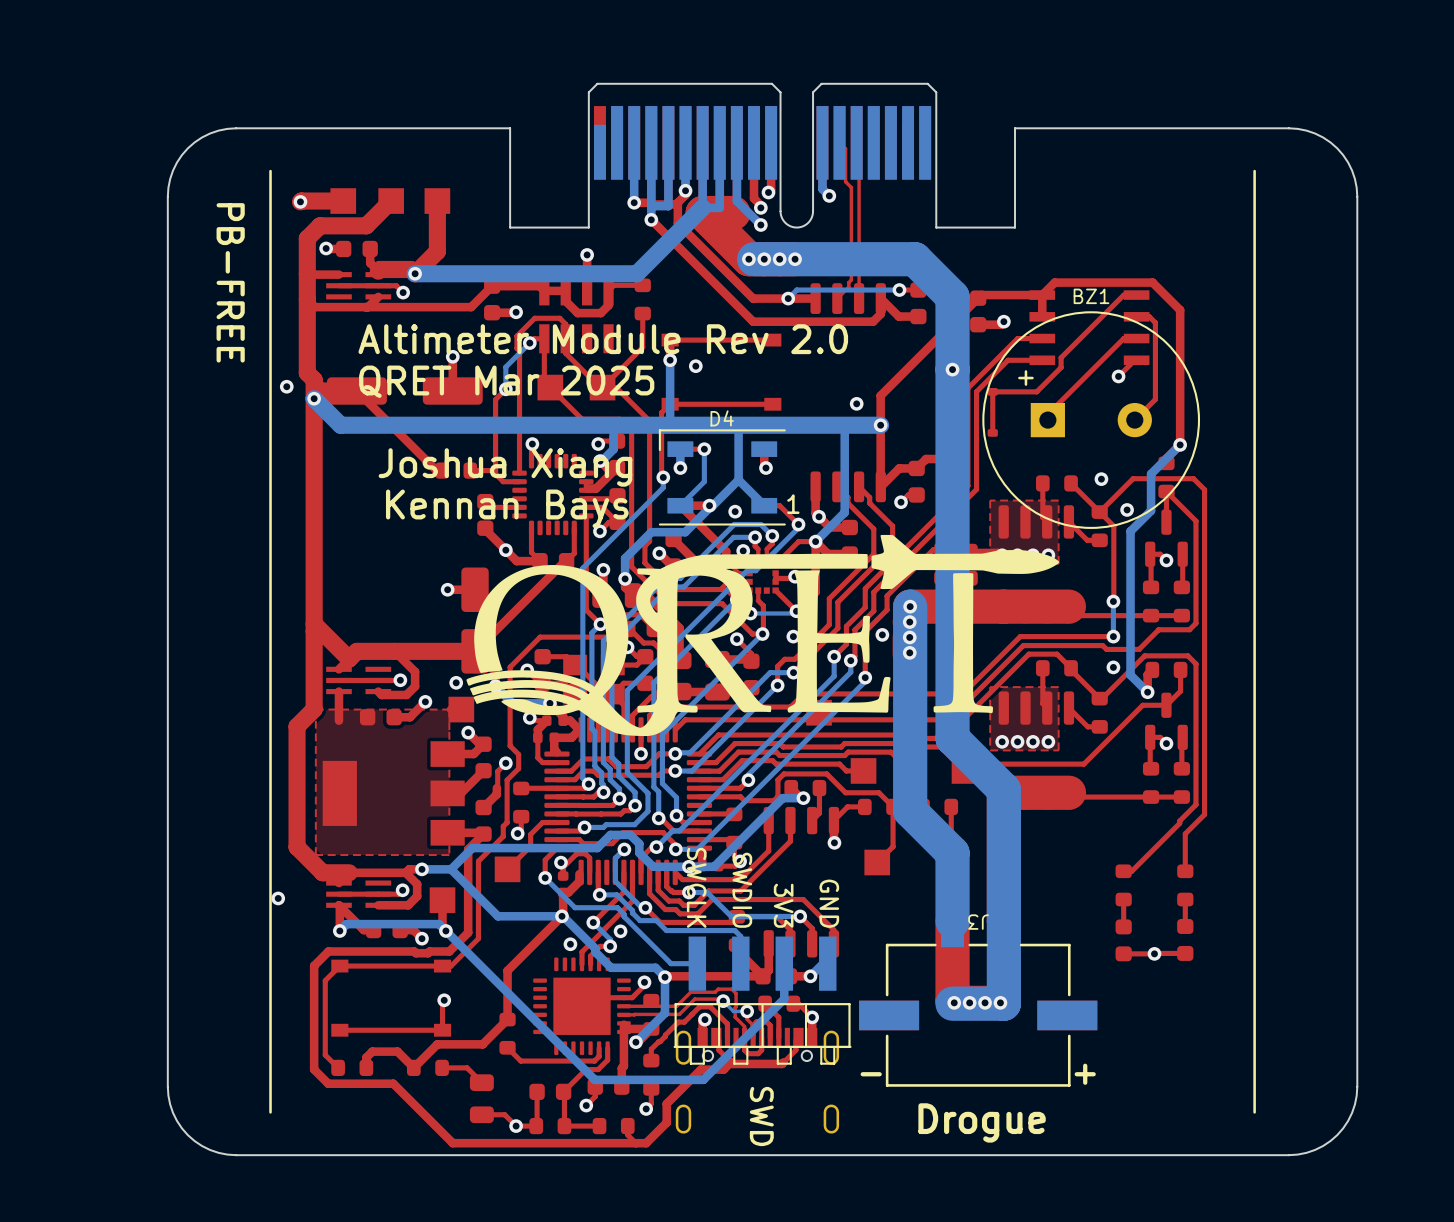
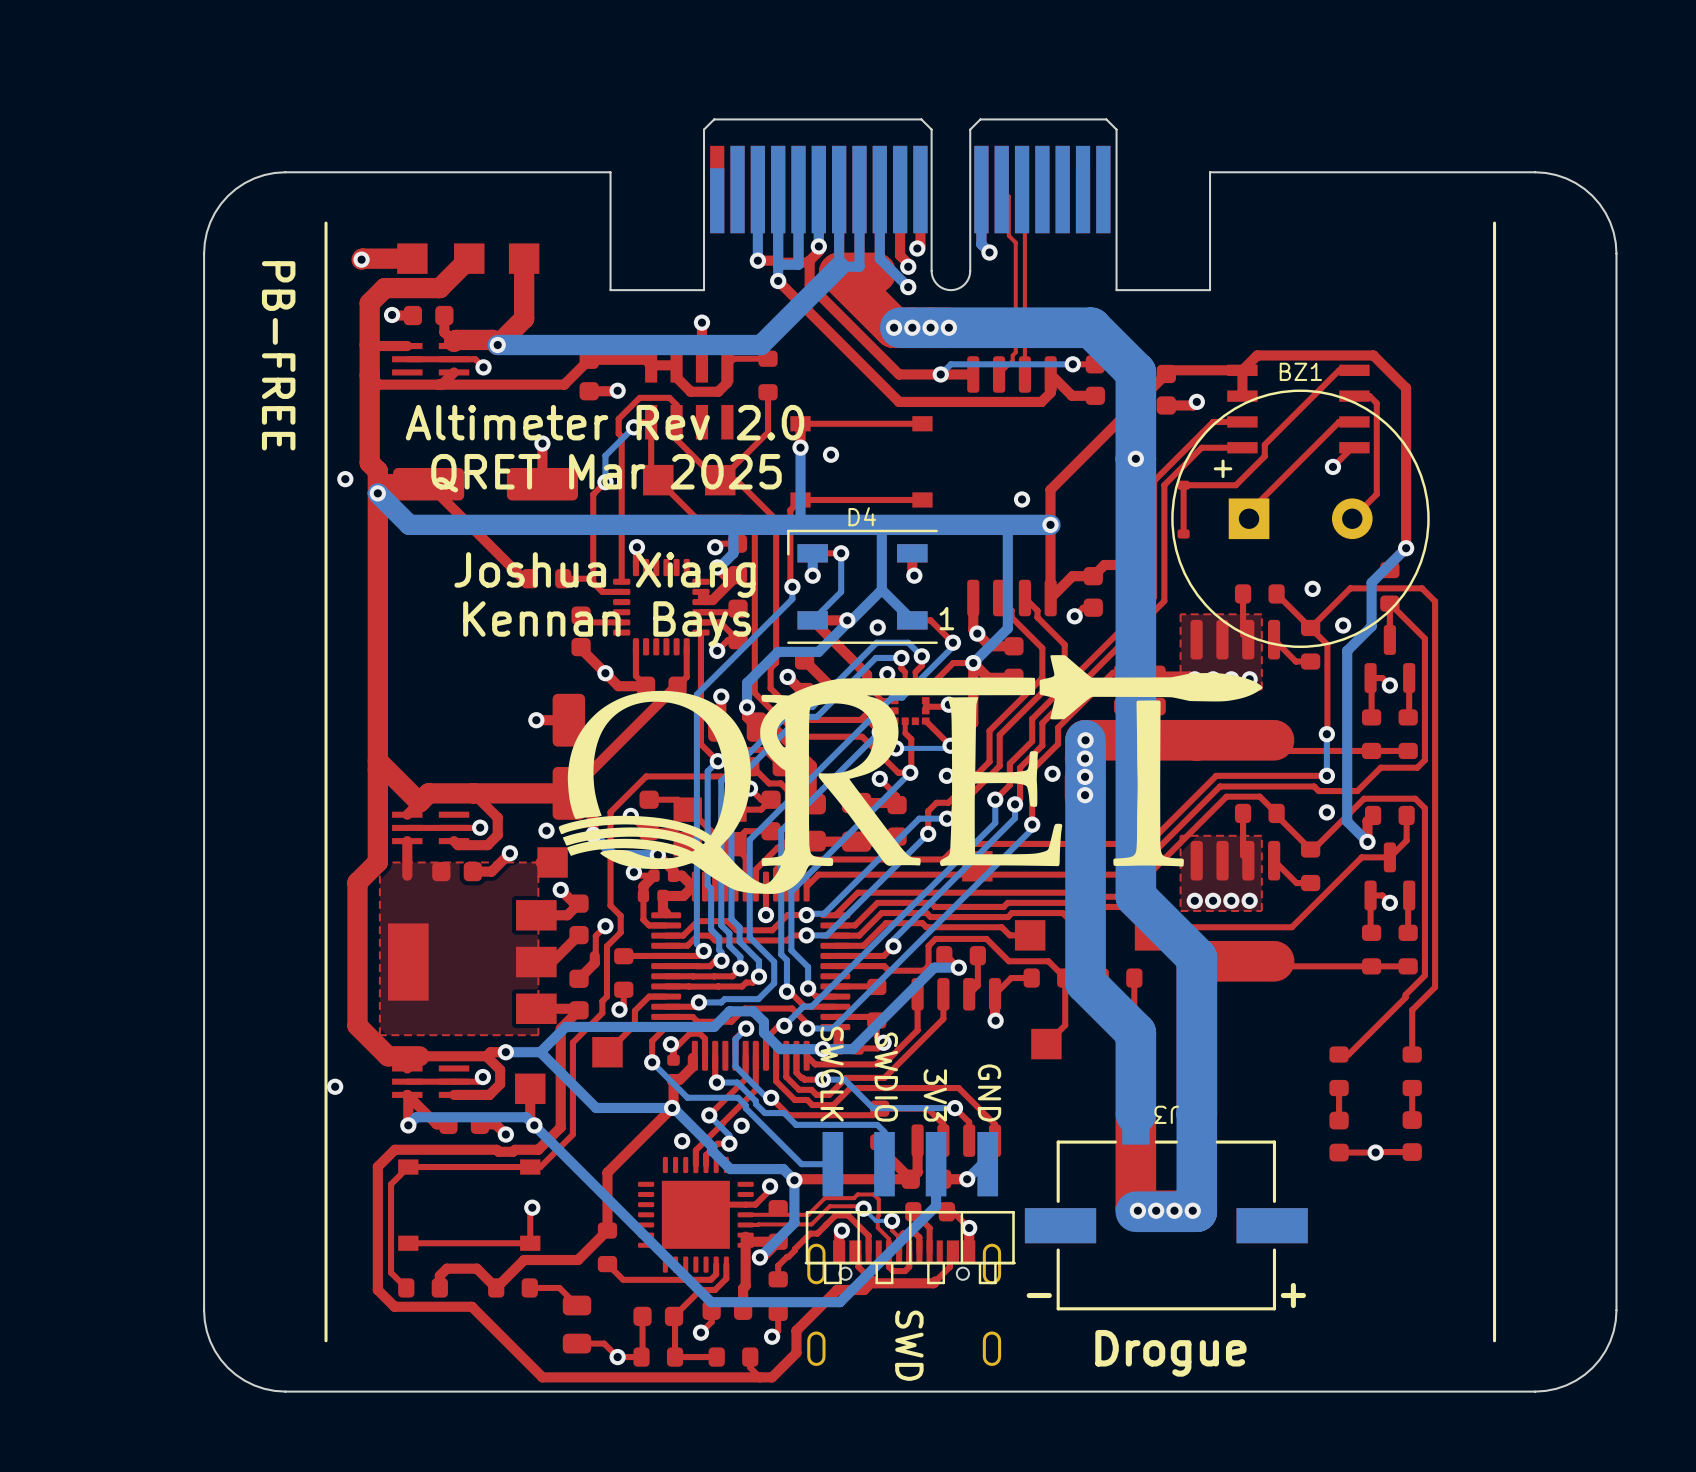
text: Altimeter Module Rev 2.0 (603, 339) -> Altimeter Rev 2.0 (605, 422)

